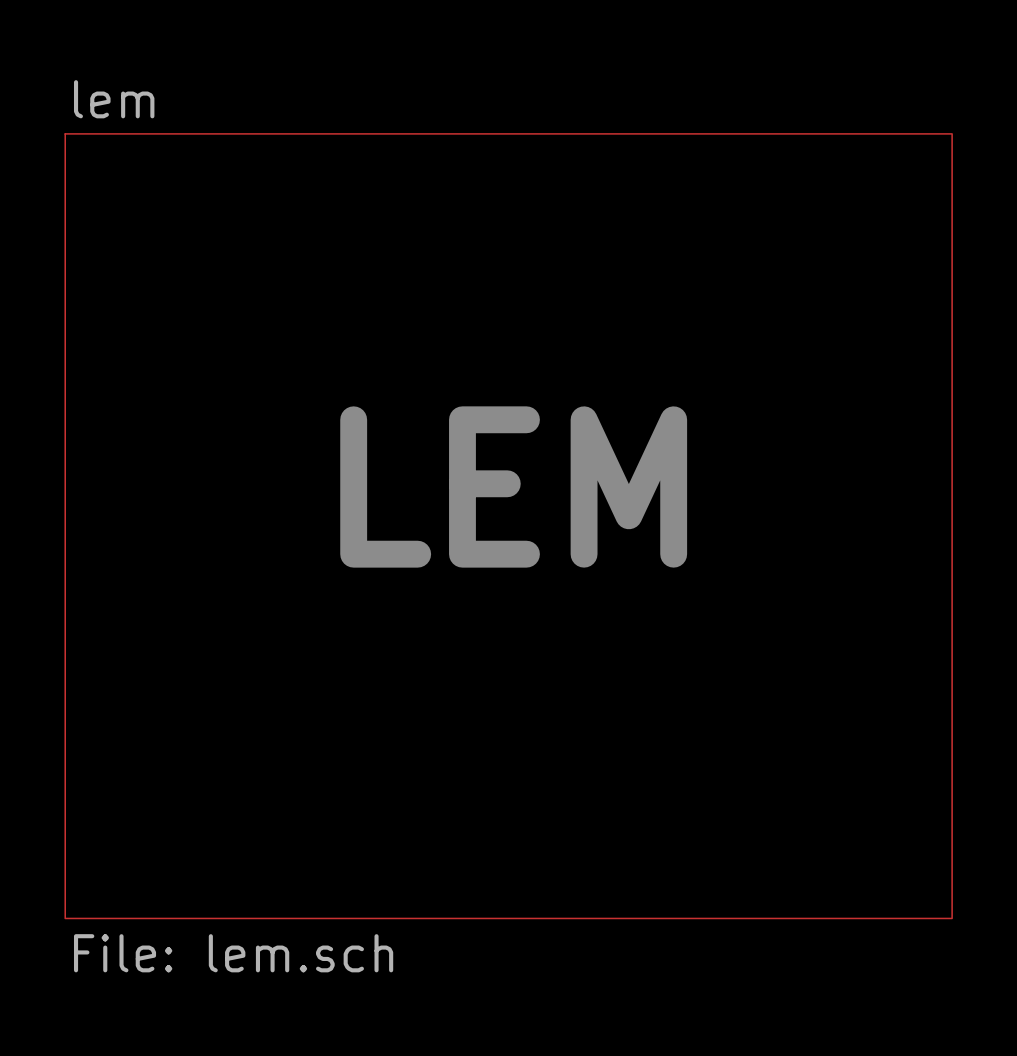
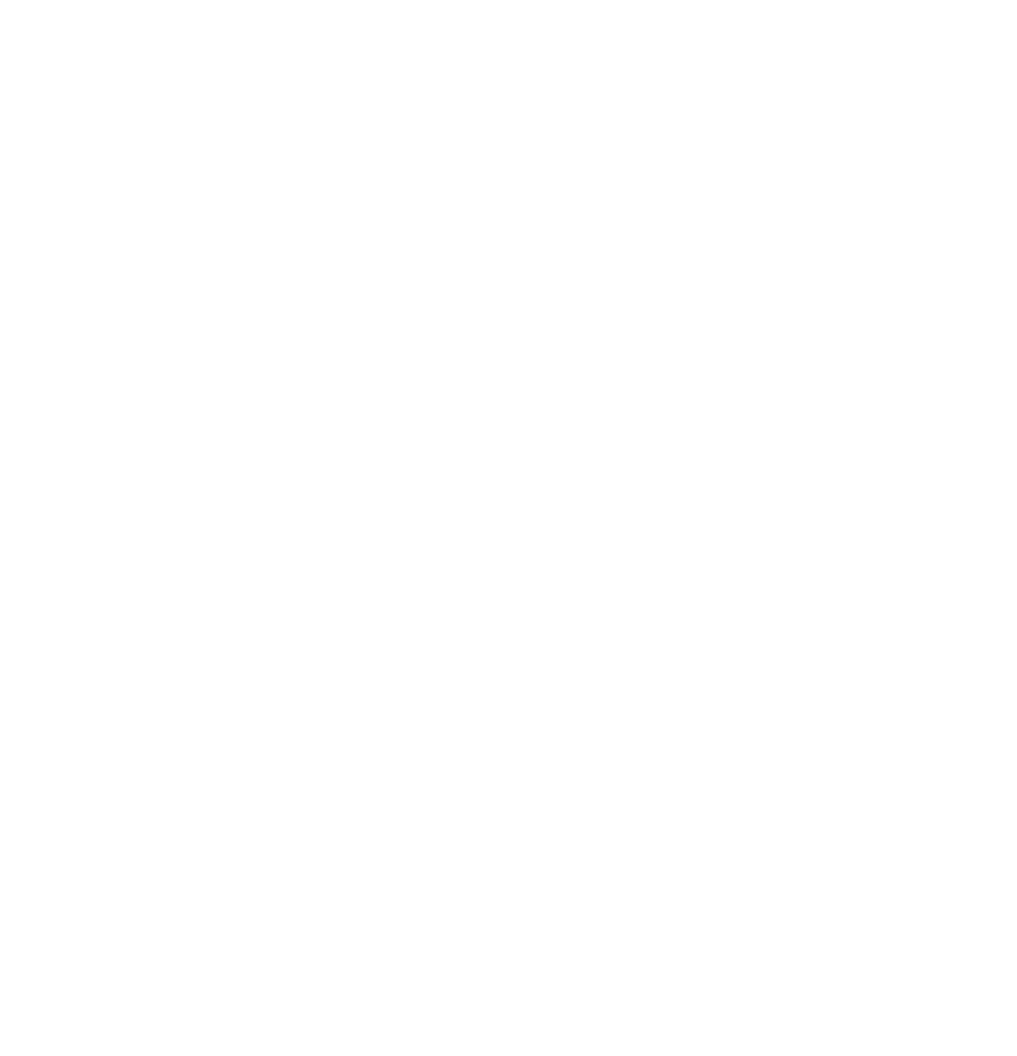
text: LEM (513, 486) -> none
sheet lem: File: lem.sch (508, 526) -> none

